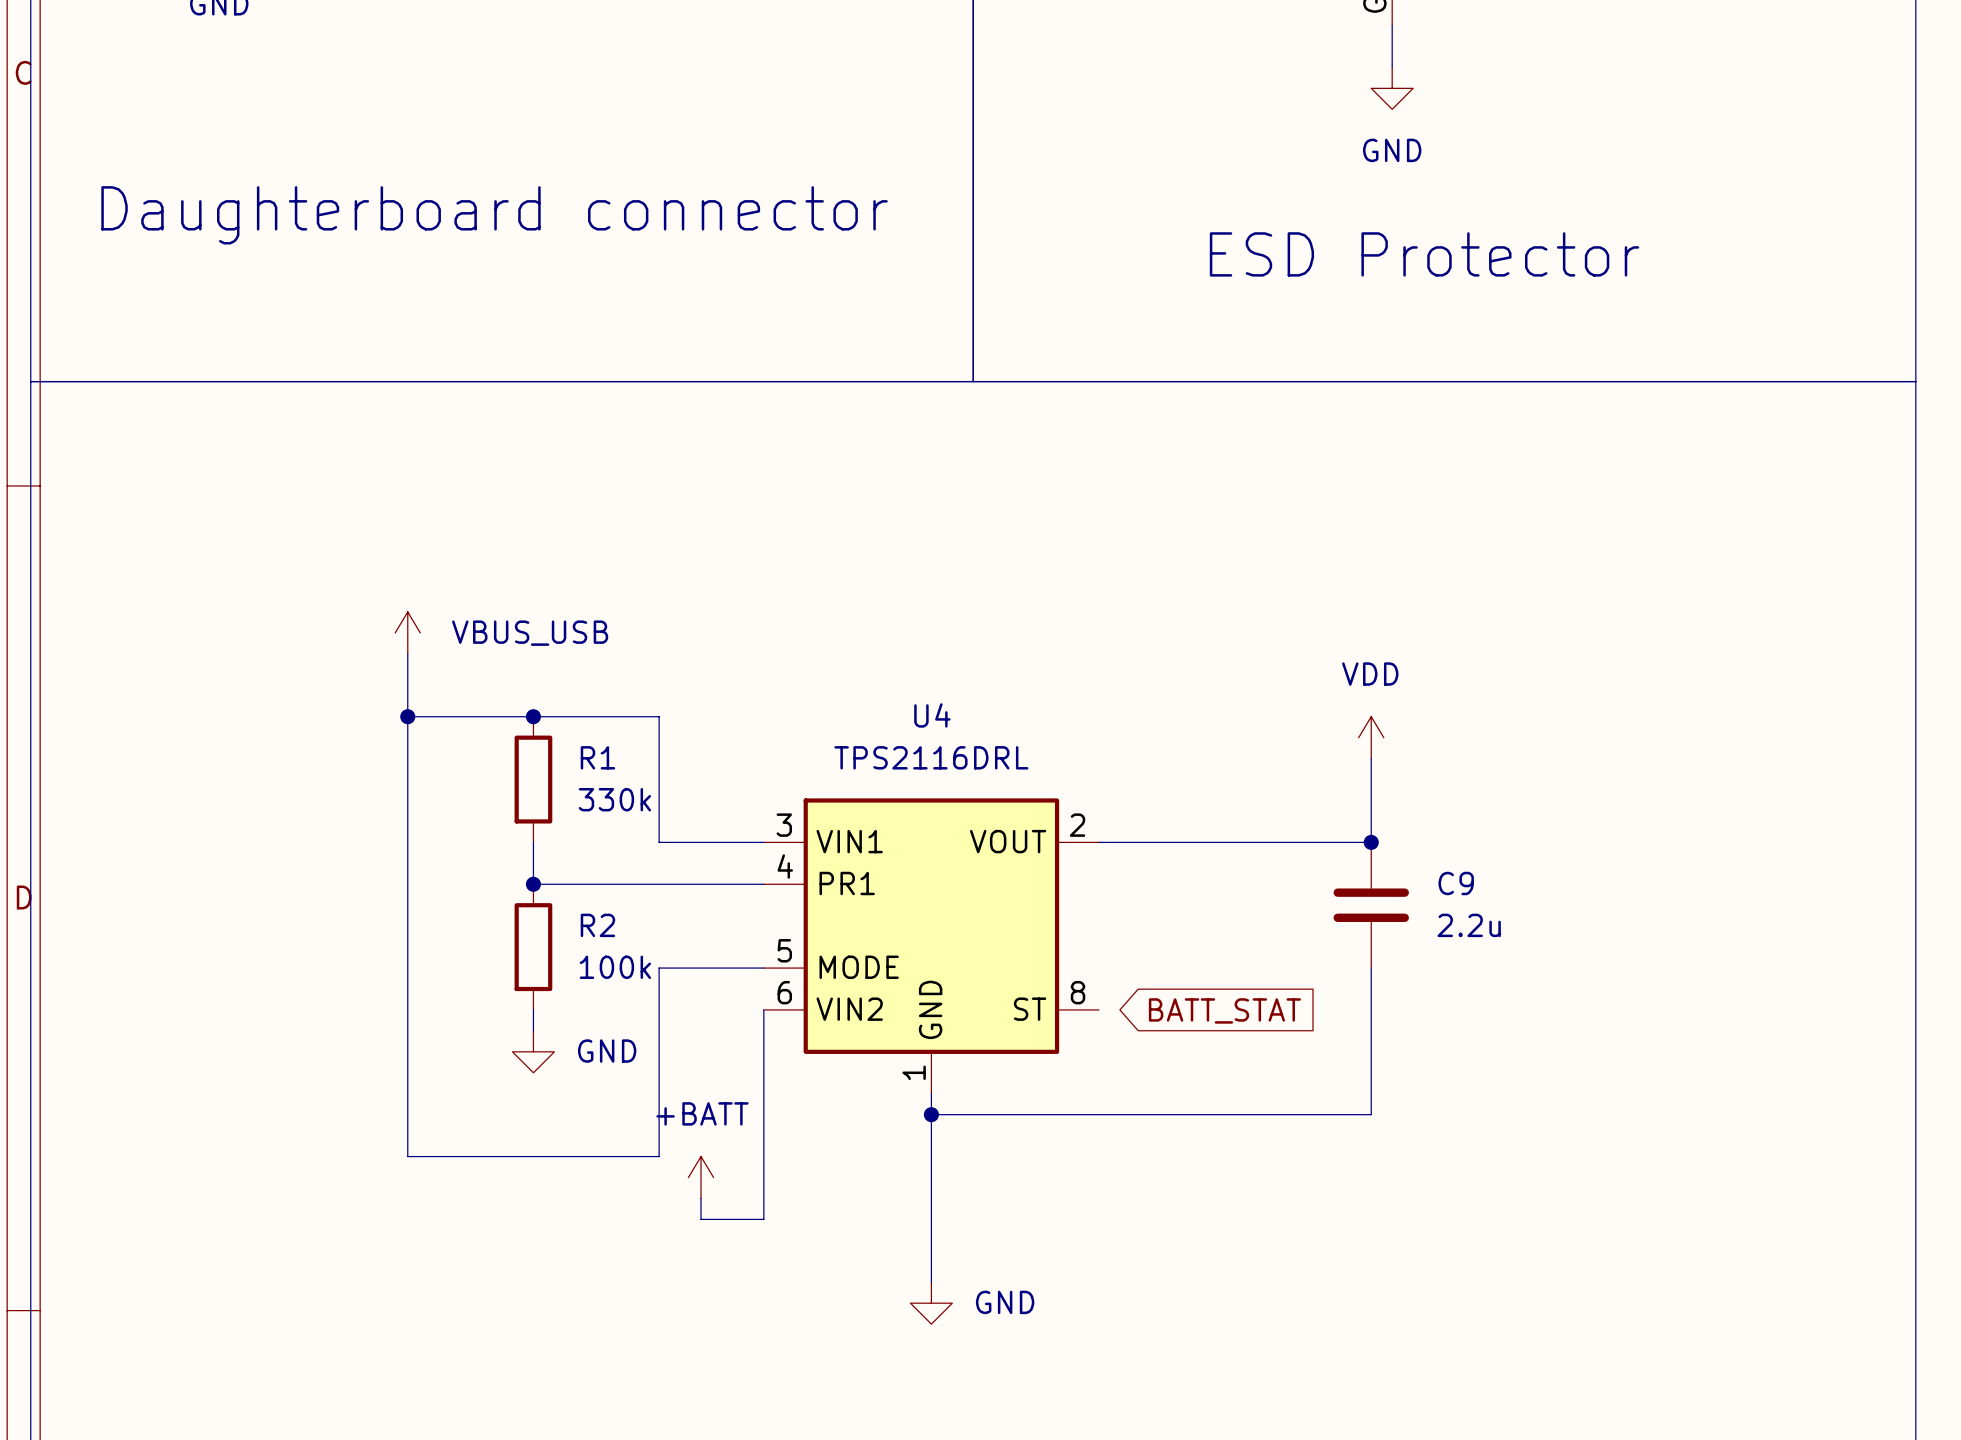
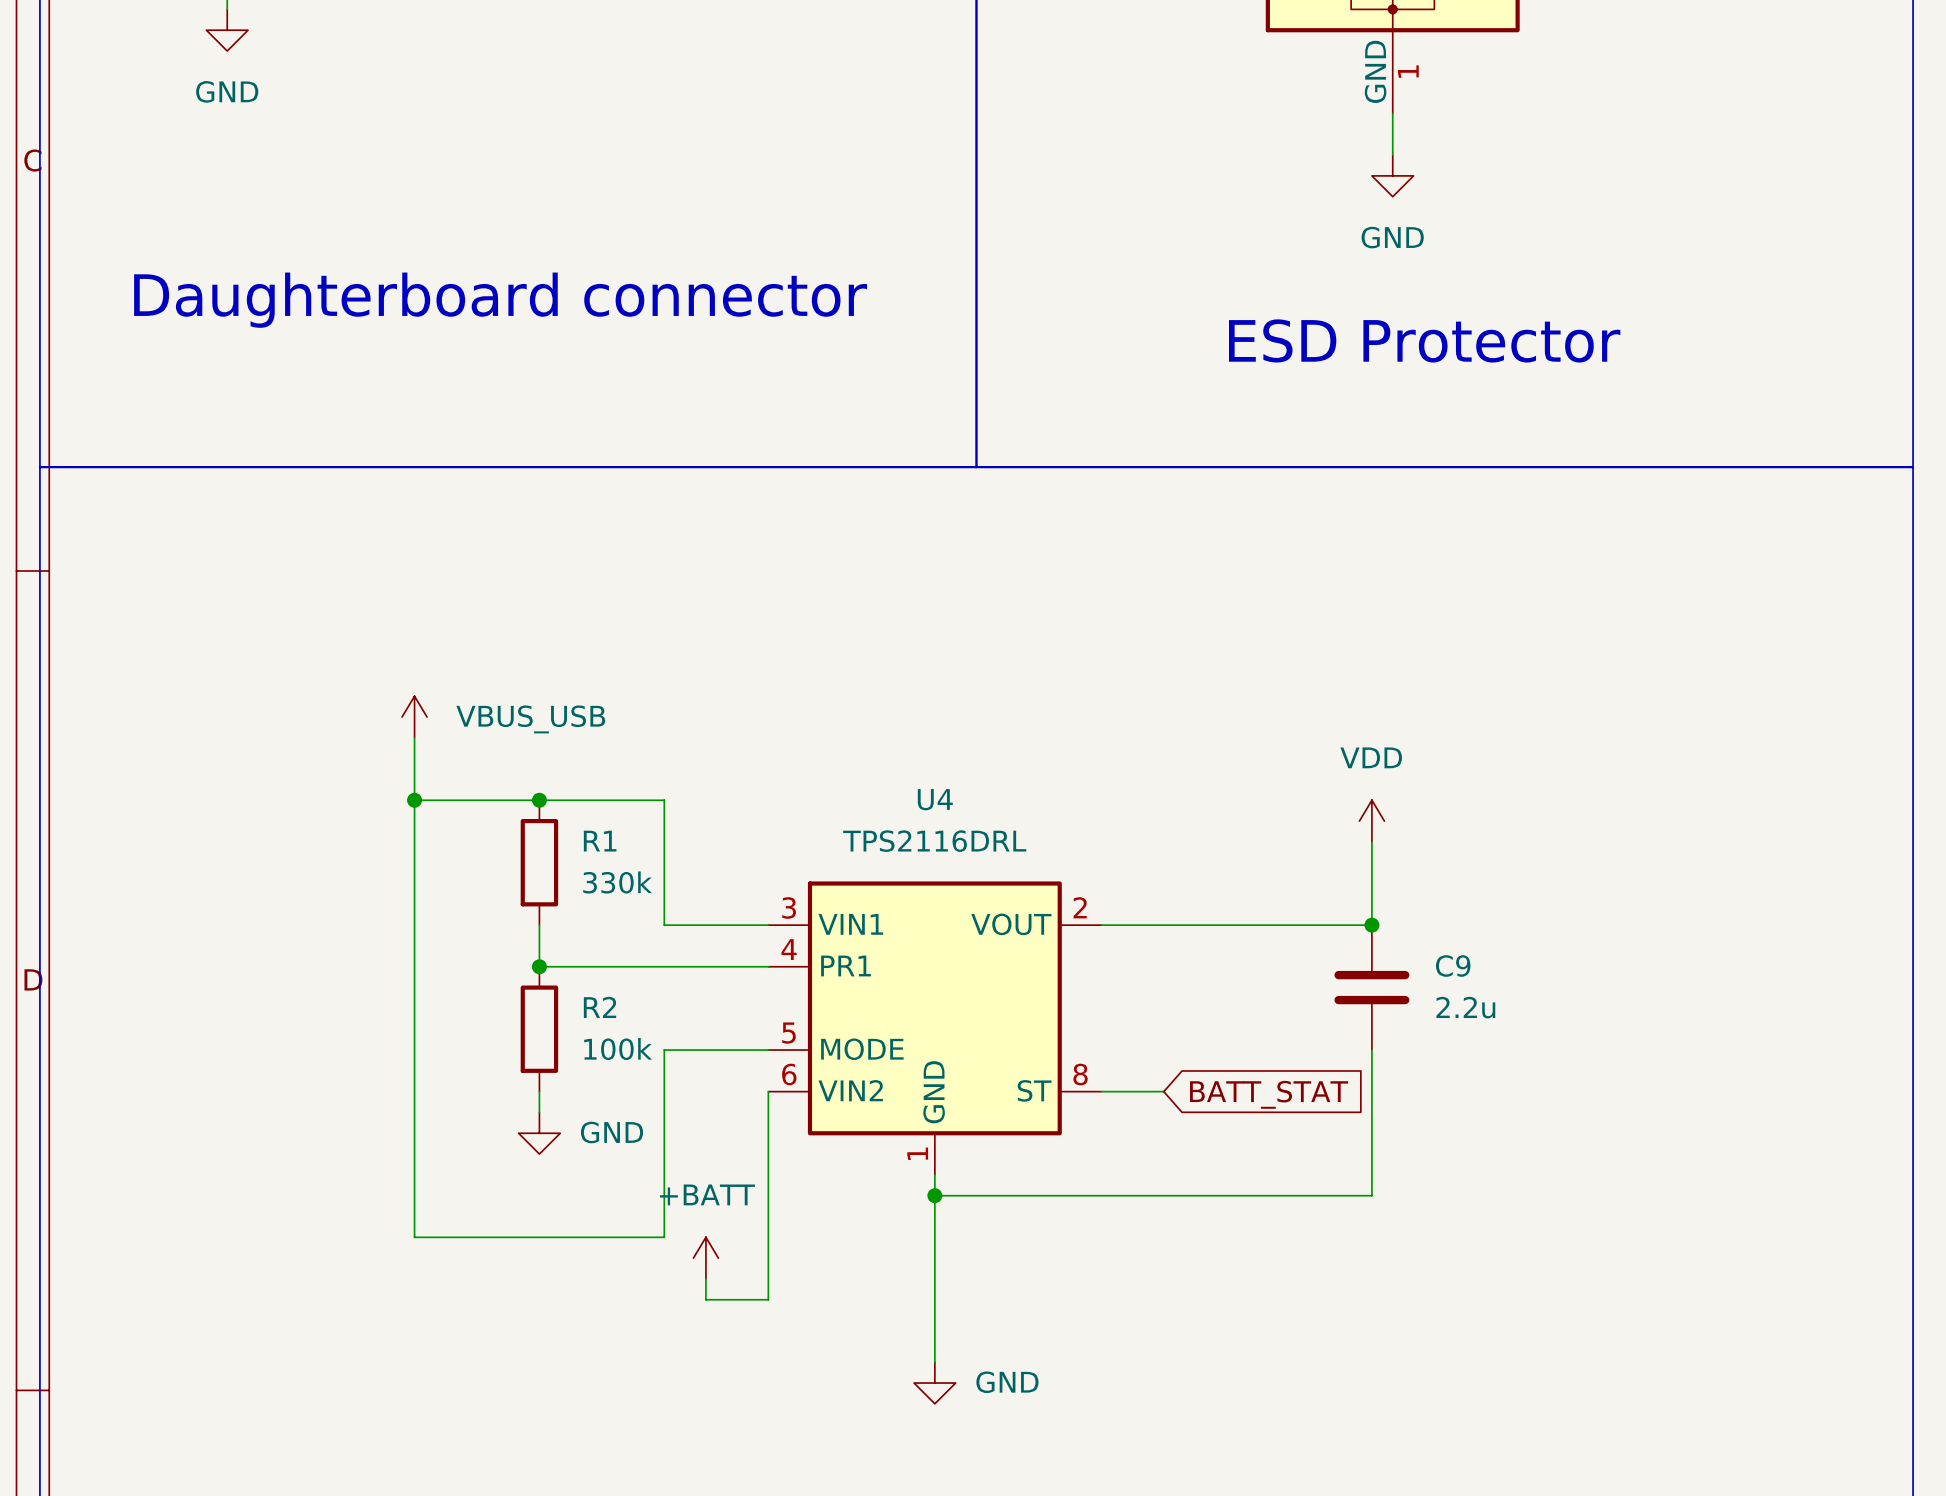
wire: none -> (1101, 1091) (1163, 1091)
global label position: BATT_STAT (1224, 1010) -> BATT_STAT (1269, 1094)

